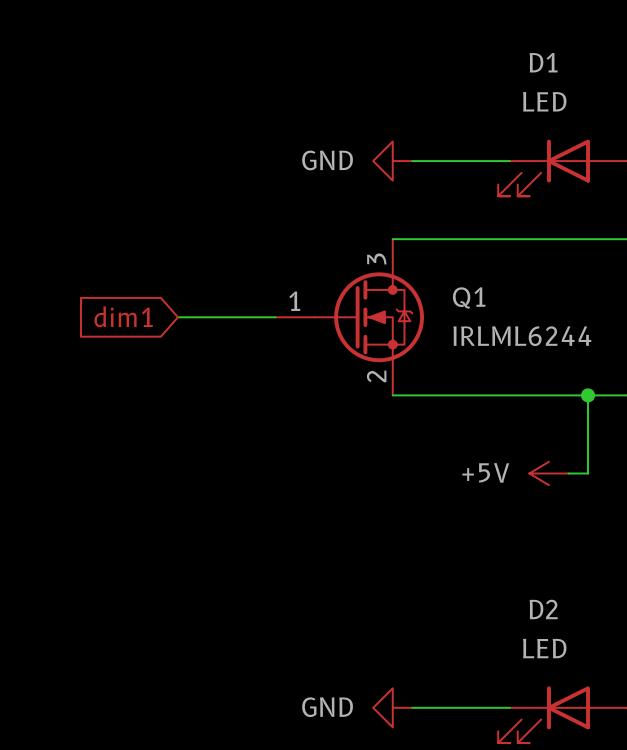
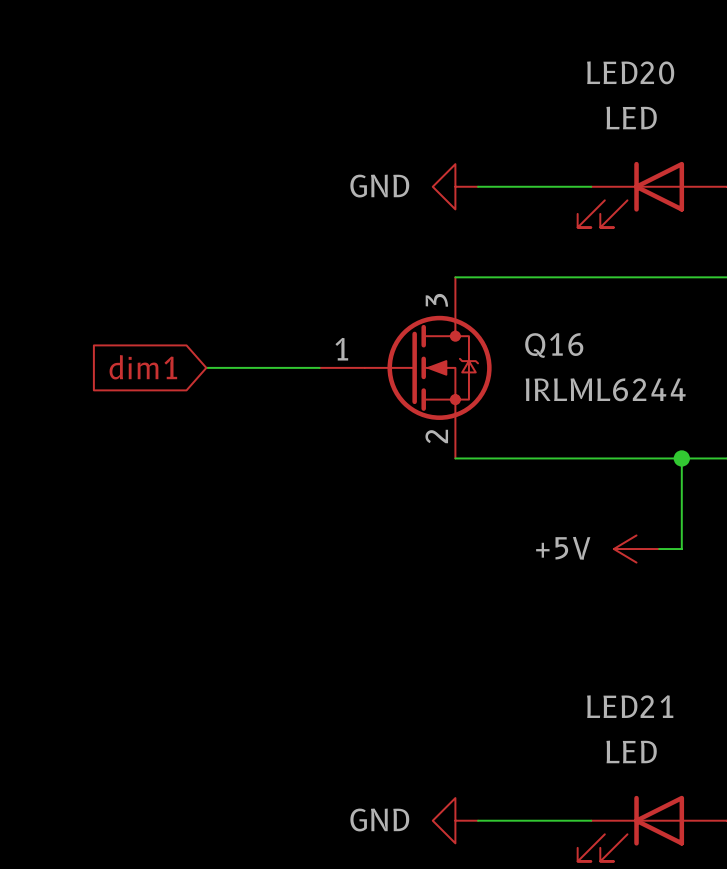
D1 name: D1 (543, 62) -> LED20 (630, 72)
Q1 name: Q1 (469, 297) -> Q16 (554, 345)
D2 name: D2 (543, 609) -> LED21 (630, 706)

